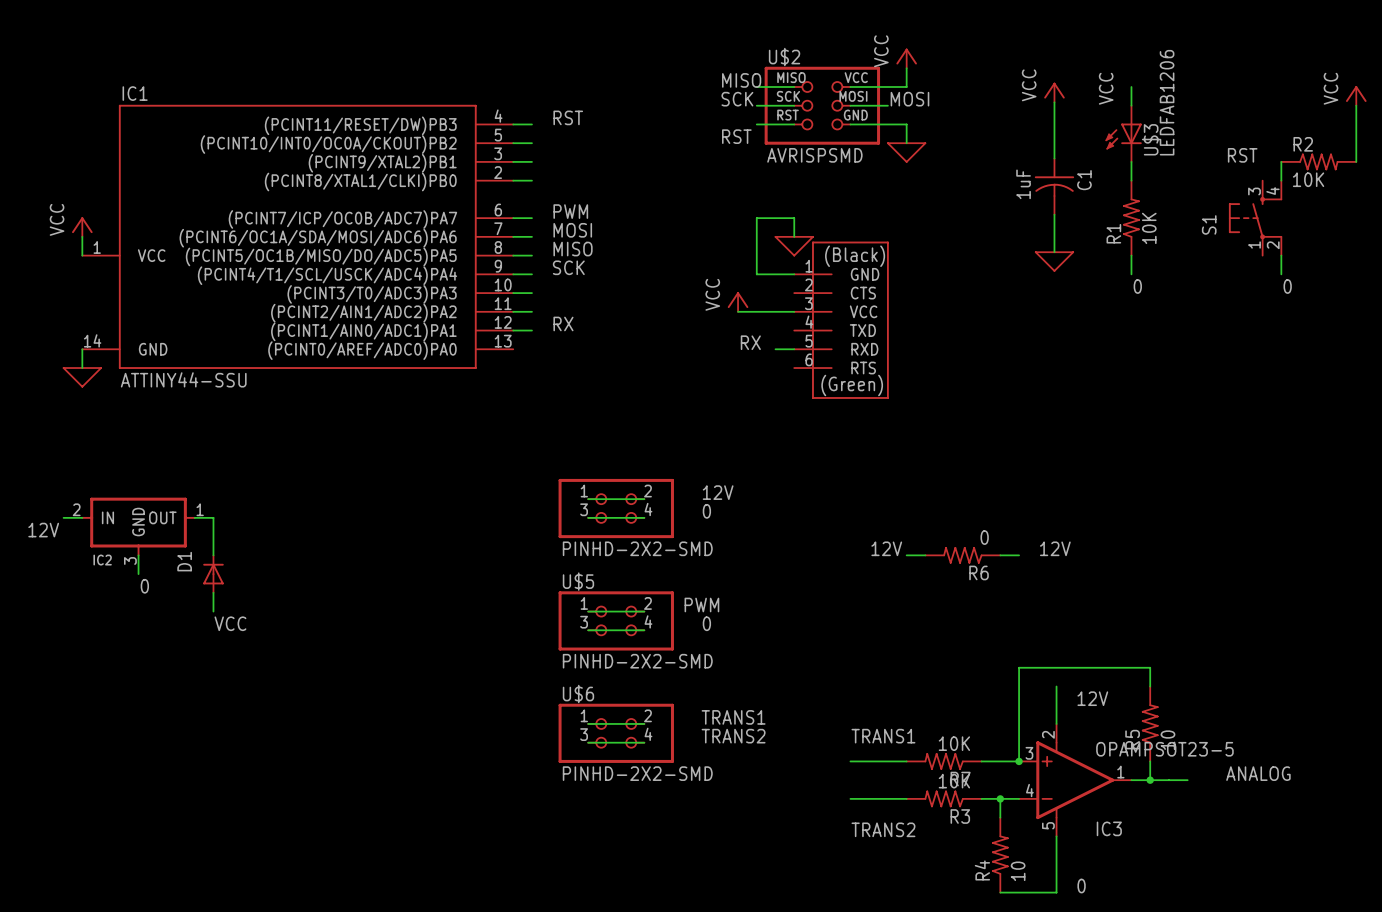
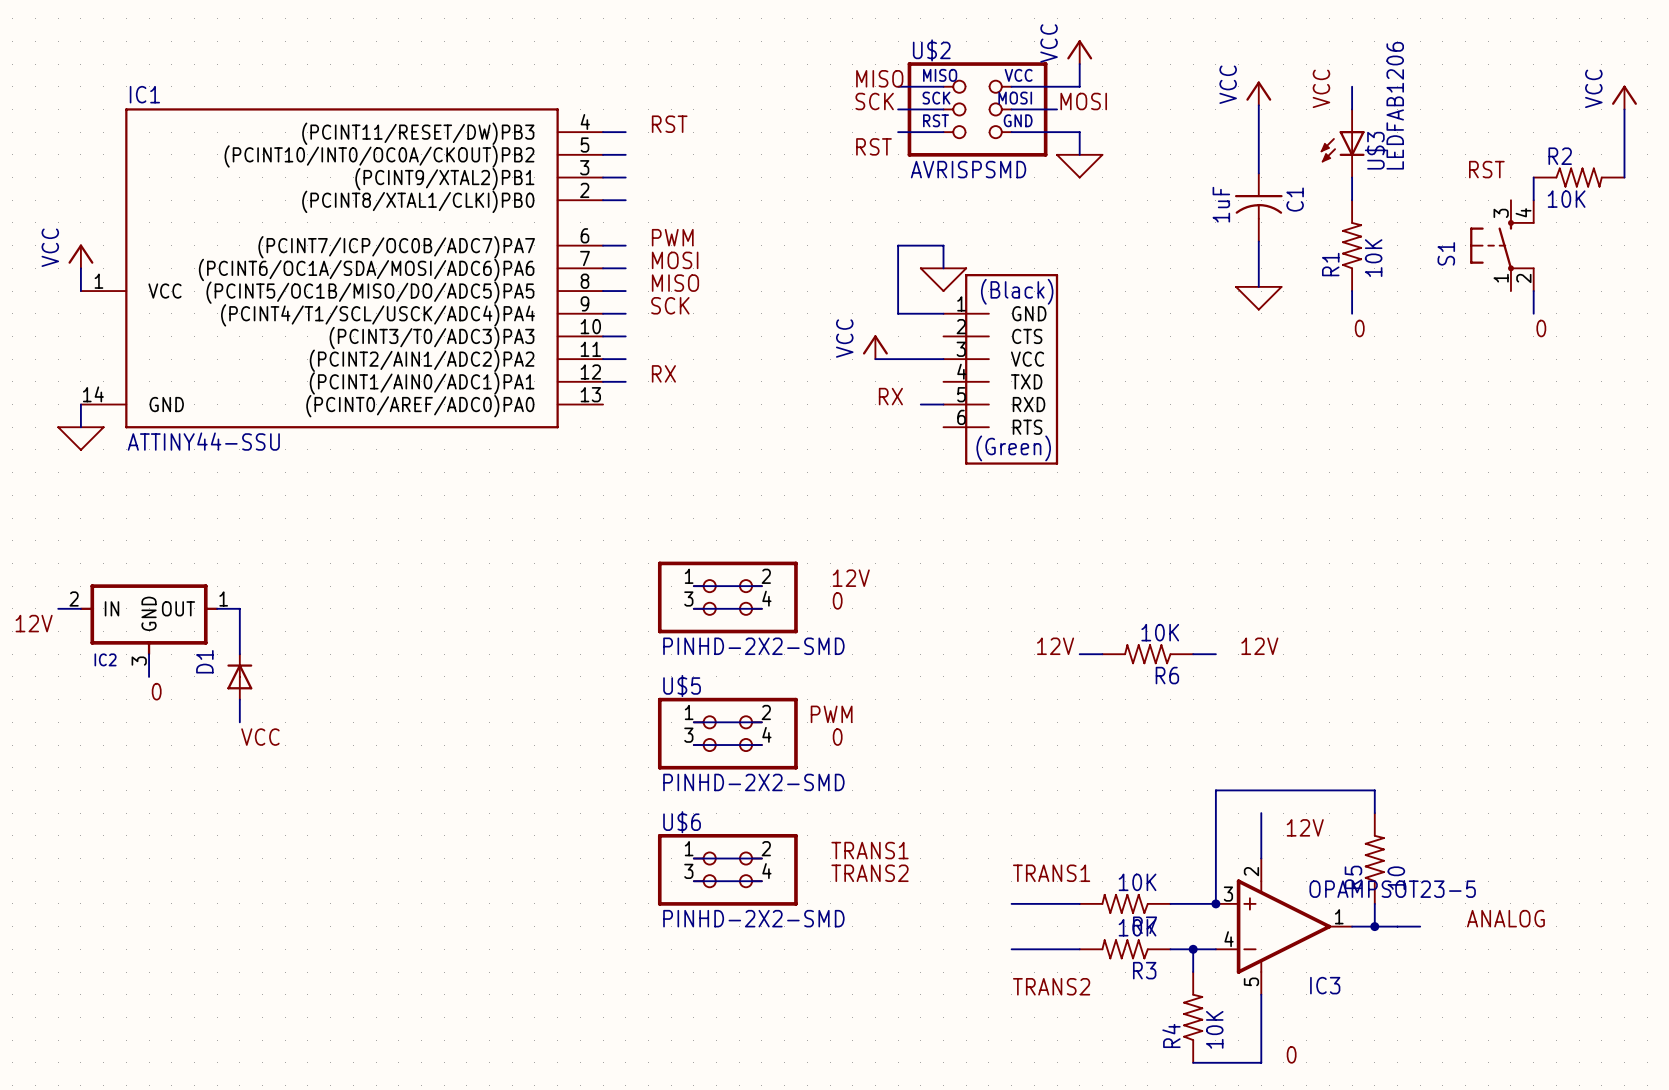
R6 value: 0 (984, 537) -> 10K (1160, 632)
R4 value: 10 (1018, 871) -> 10K (1214, 1029)

